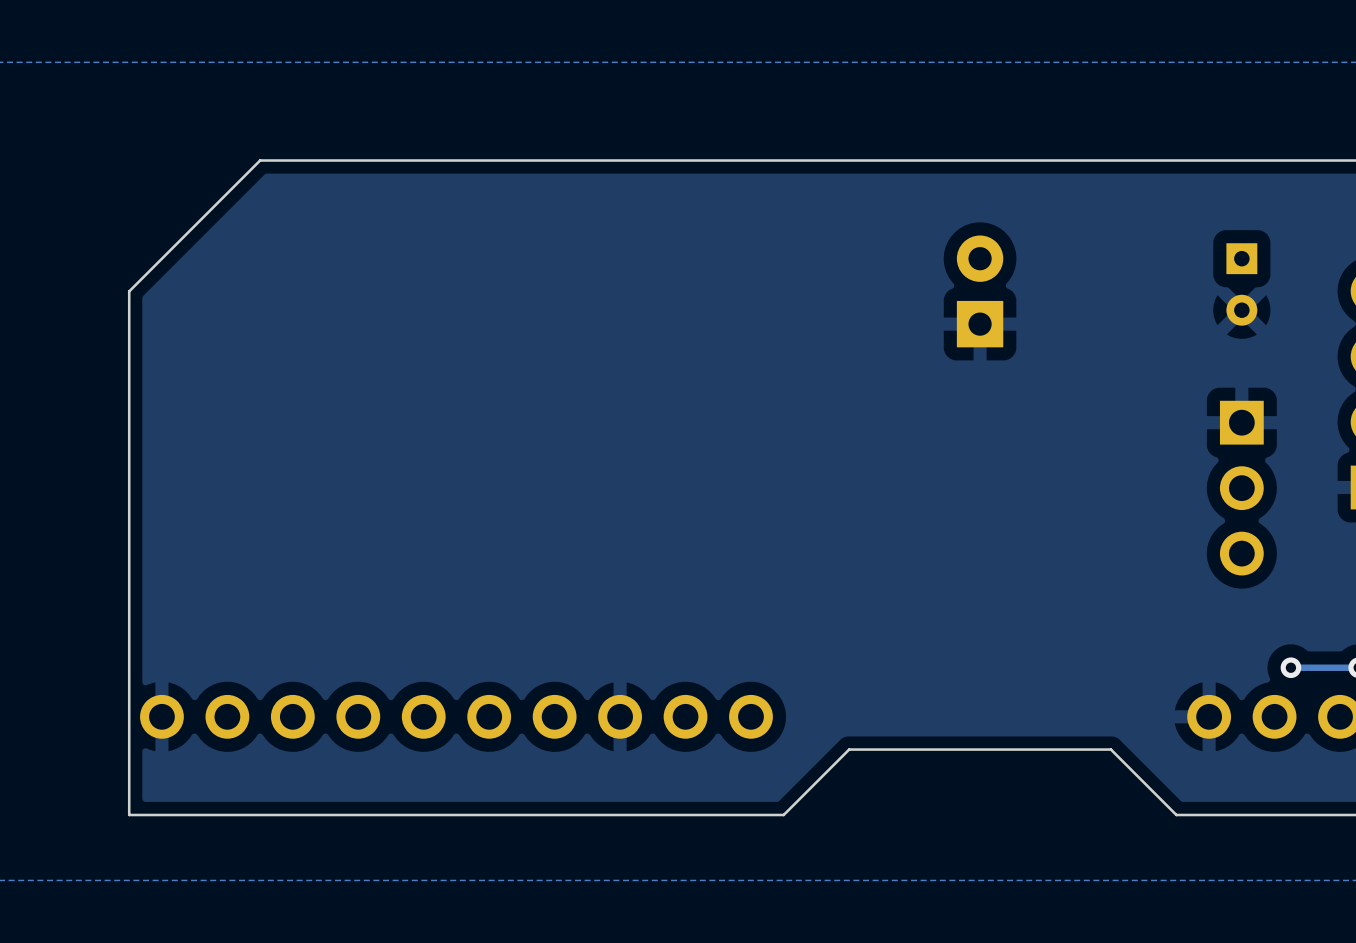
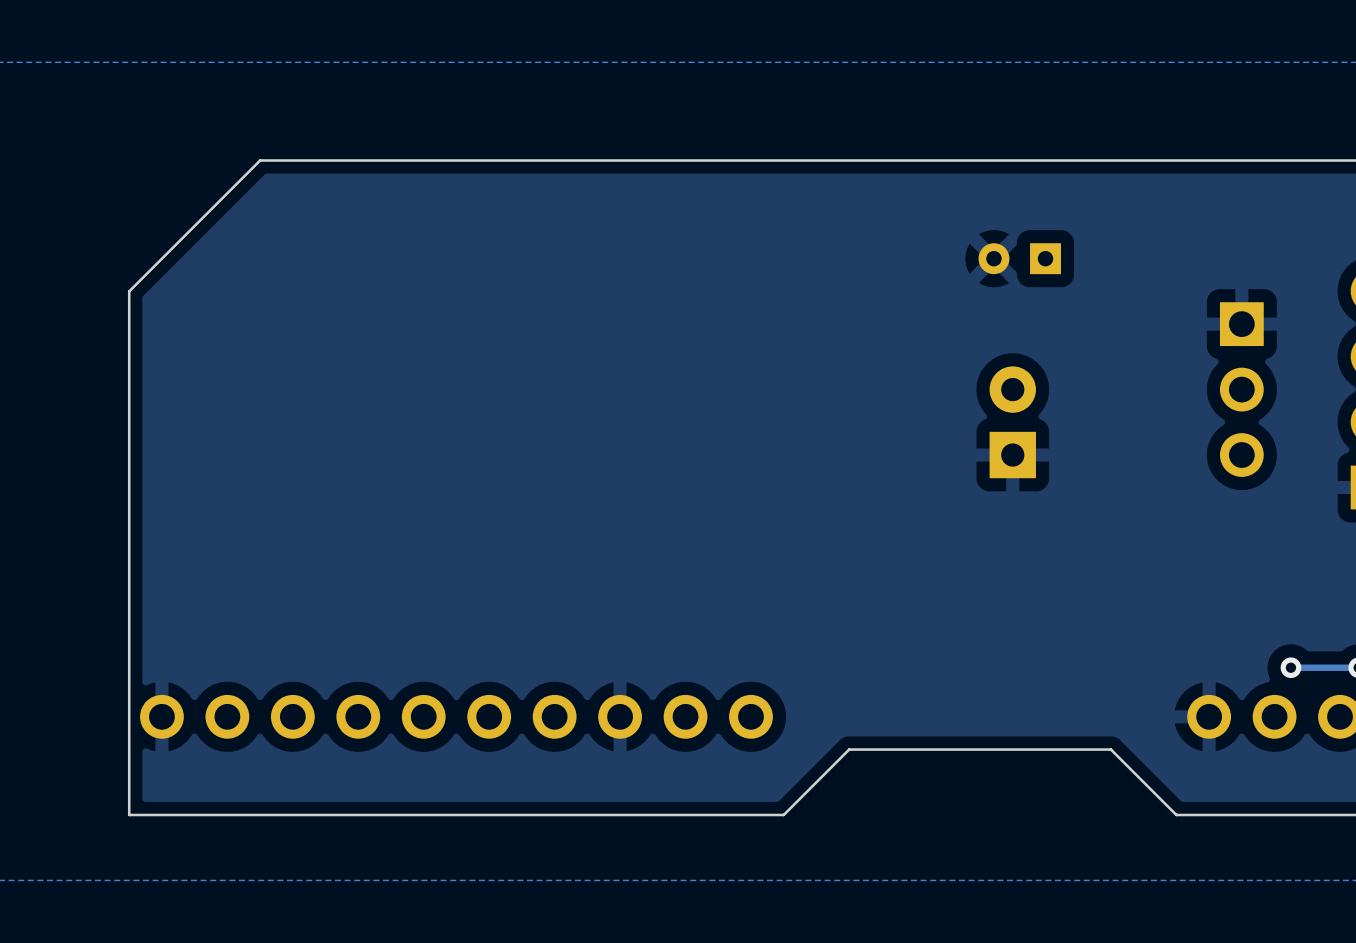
part rotation: 0° (1241, 284) -> 90° clockwise (1019, 258)
part position: (1241, 284) -> (1019, 258)
part position: (980, 291) -> (1012, 422)
part position: (1241, 488) -> (1241, 389)

